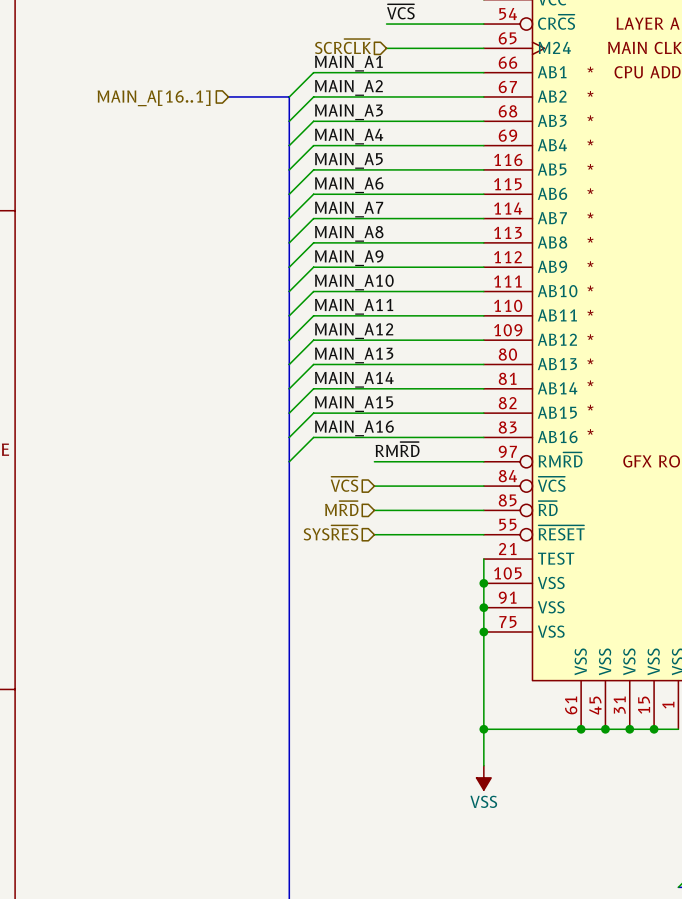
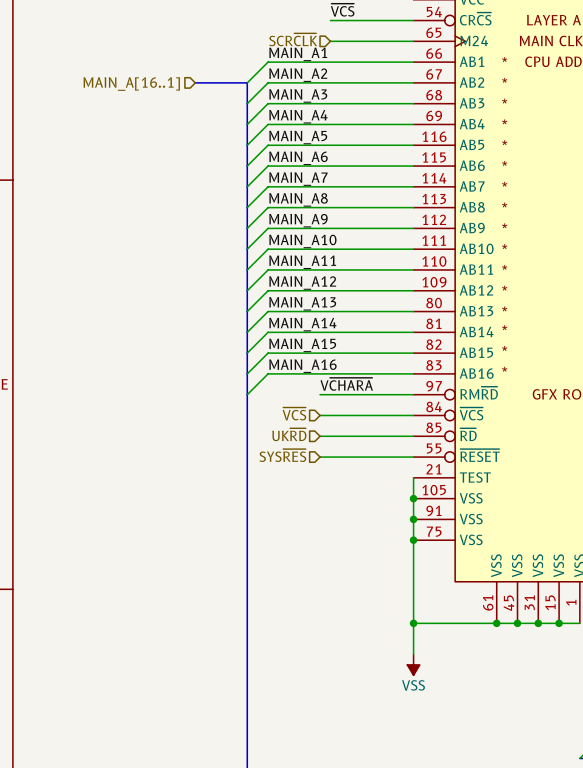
label: RM~{RD} (397, 449) -> V~{CHARA} (346, 384)
hierarchical label: M~{RD} (341, 508) -> UK~{RD} (289, 434)

